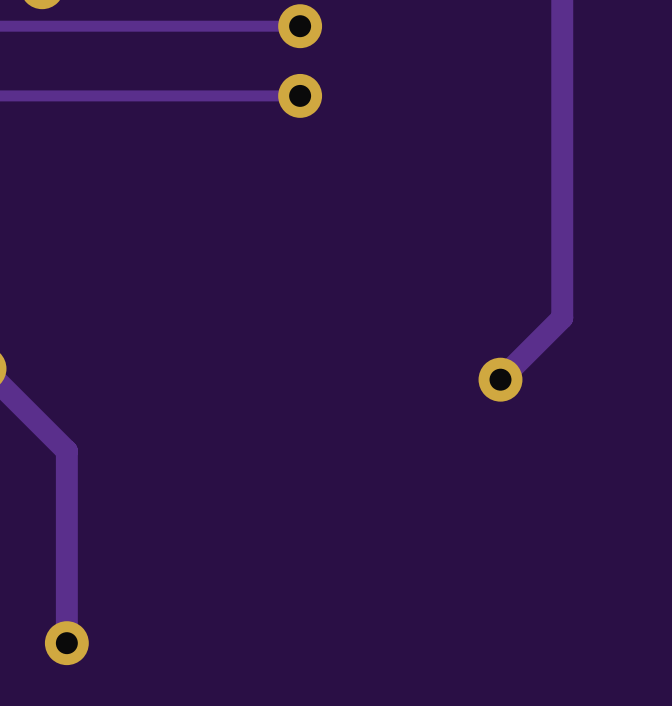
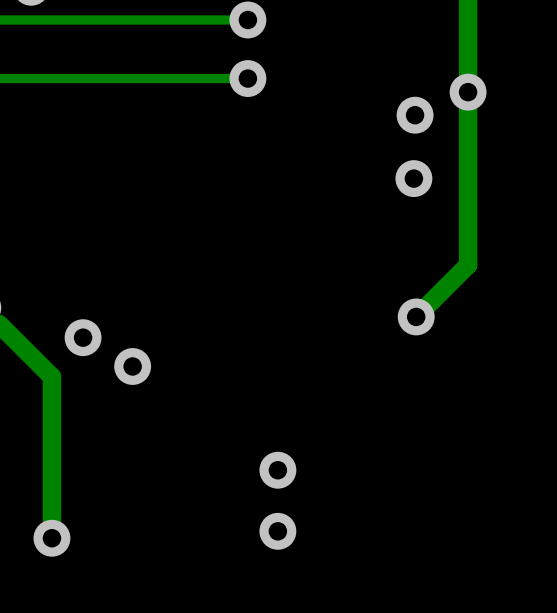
via: none -> (468, 92)
via: none -> (415, 115)
via: none -> (413, 178)
via: none -> (83, 337)
via: none -> (132, 366)
via: none -> (277, 470)
via: none -> (277, 531)

